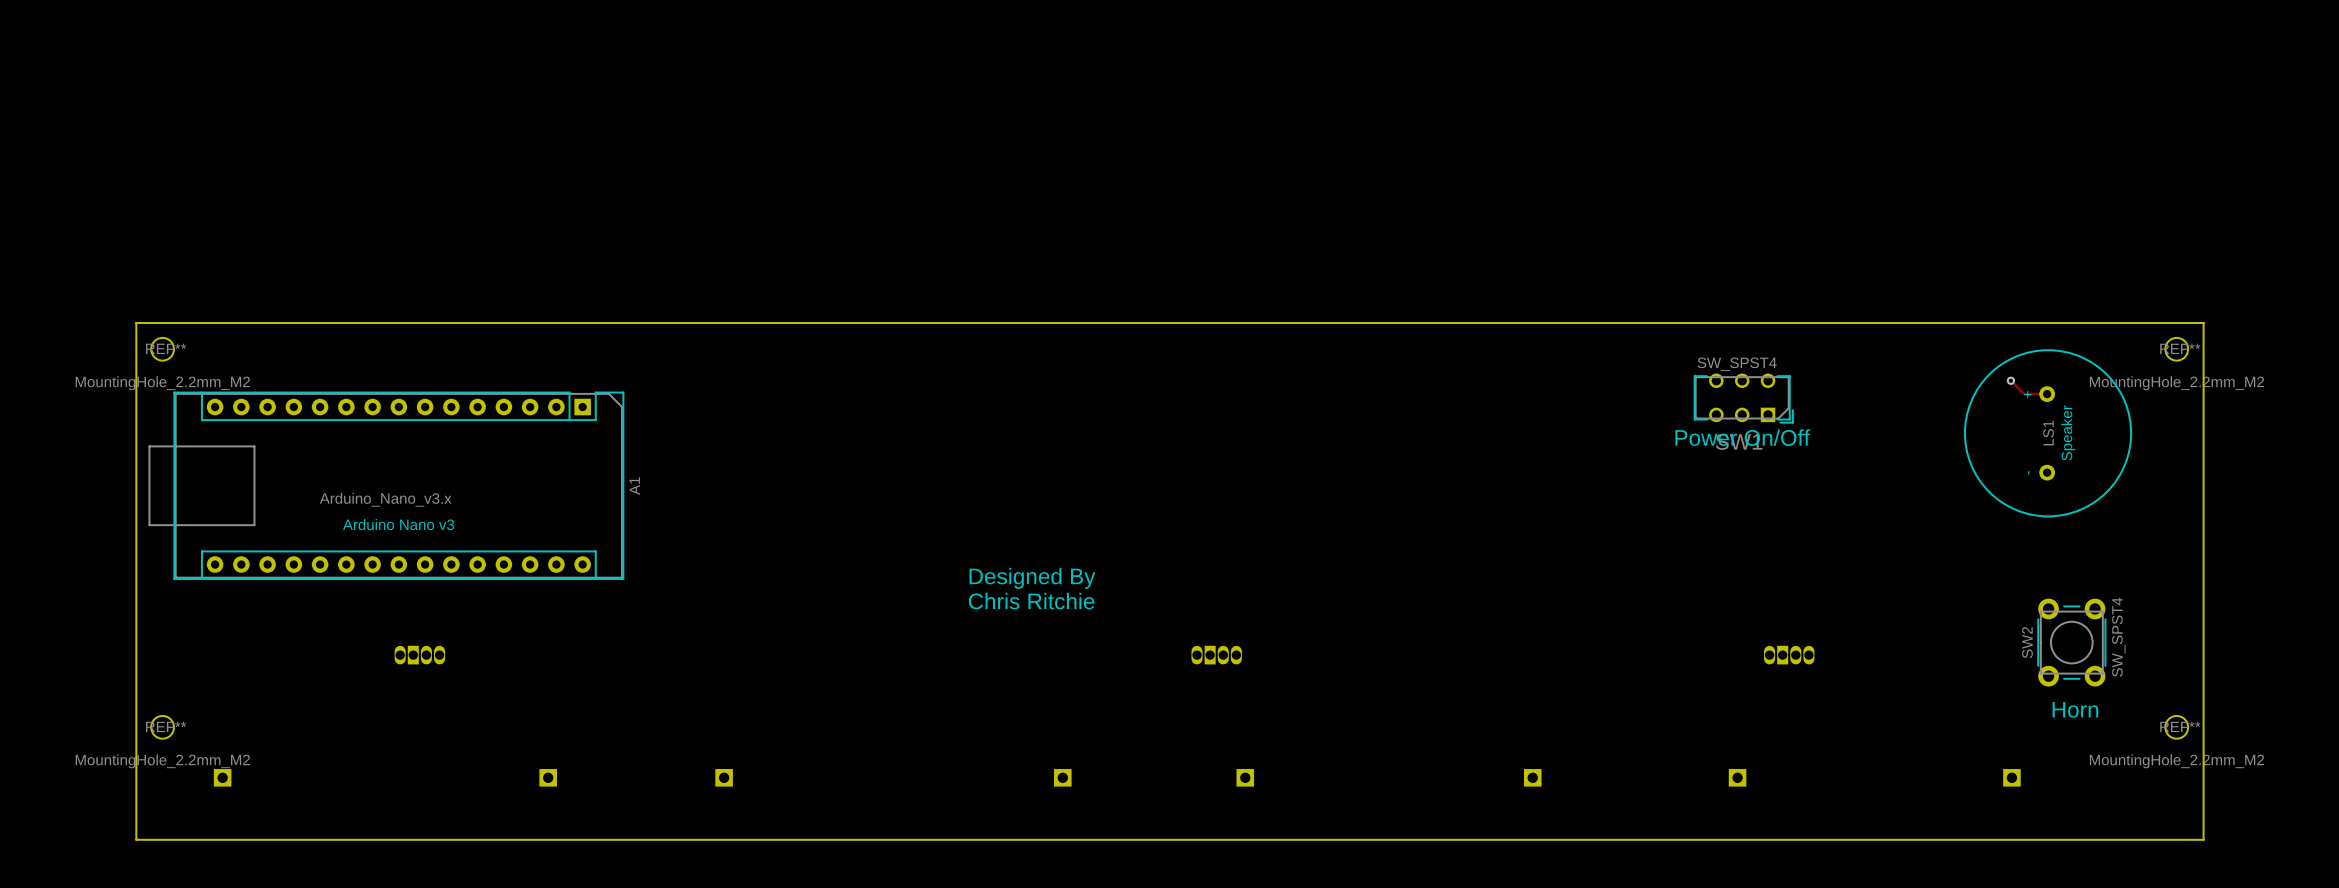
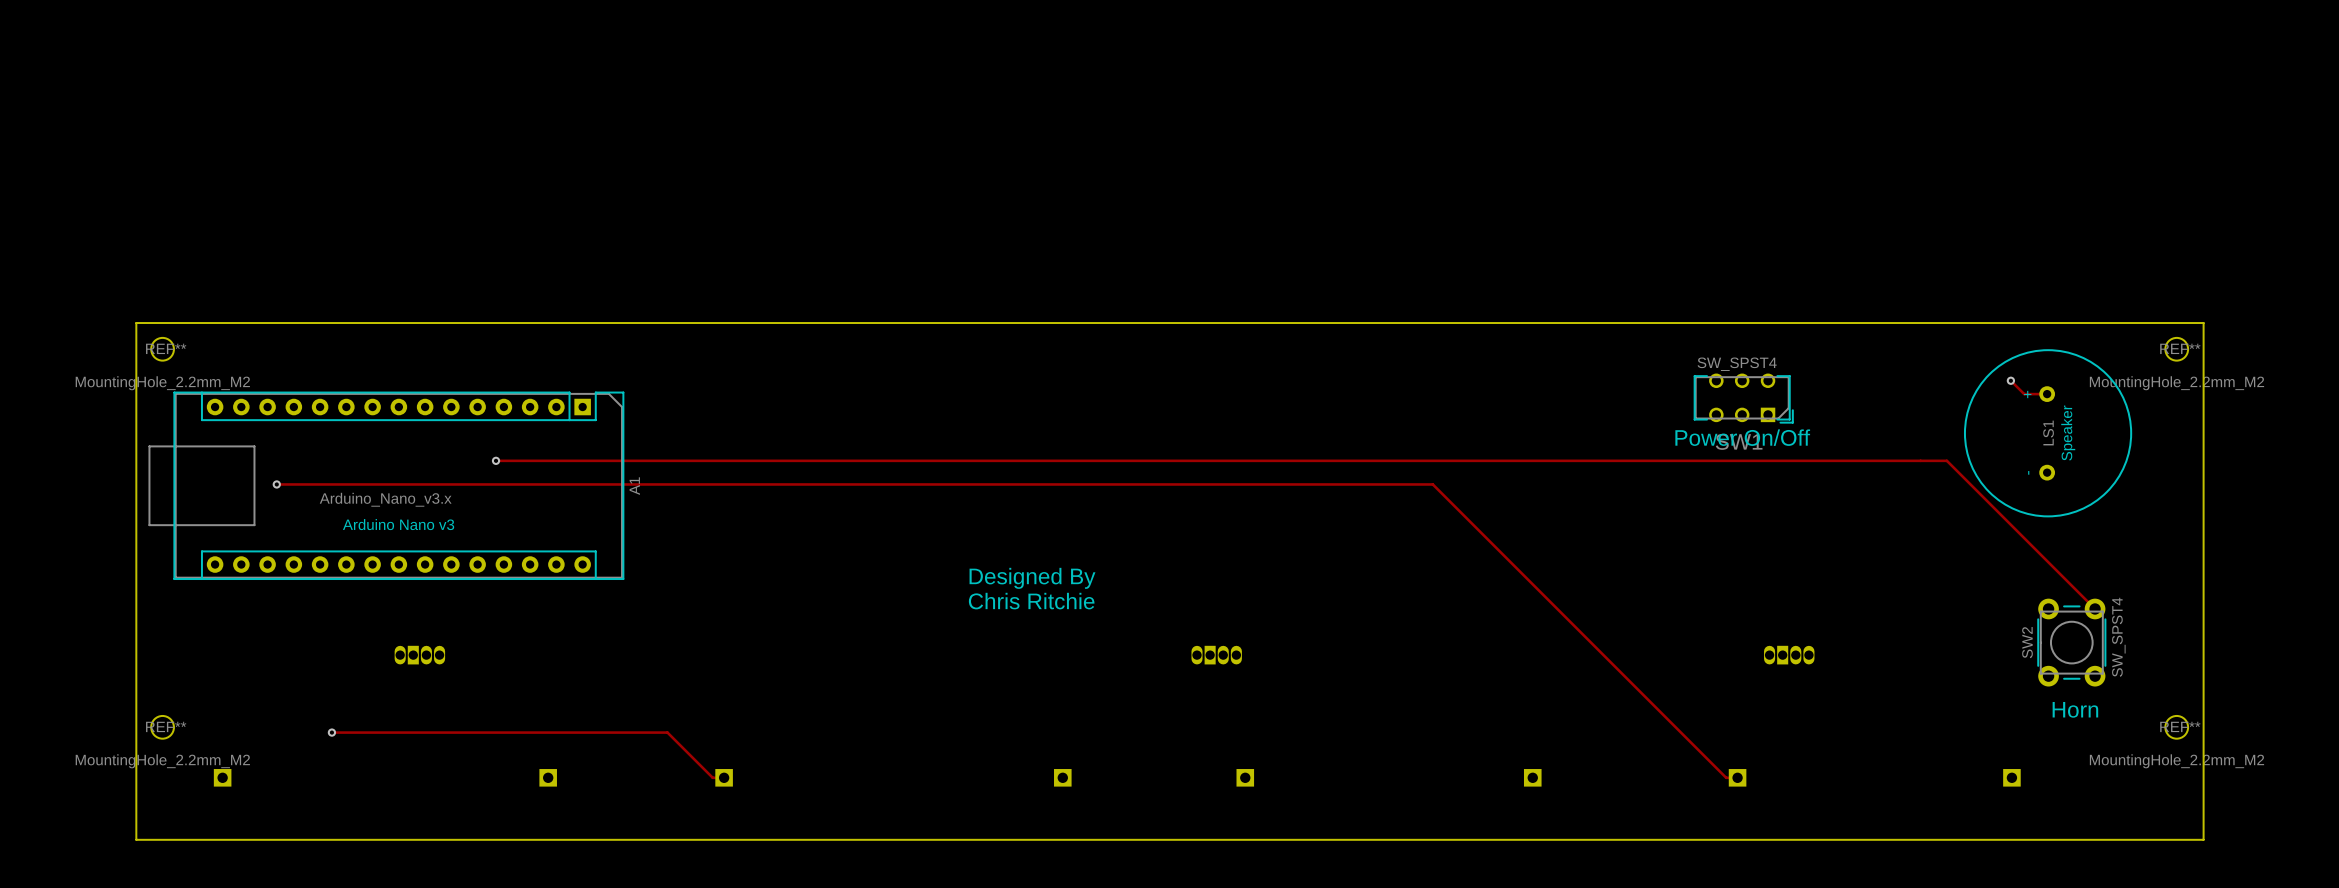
track: none -> (496, 460) (1946, 460) (2095, 608)
via: none -> (496, 460)
track: none -> (276, 484) (1432, 484) (1726, 777) (1737, 777)
via: none -> (276, 484)
track: none -> (331, 732) (667, 732) (712, 777) (724, 777)
via: none -> (331, 732)

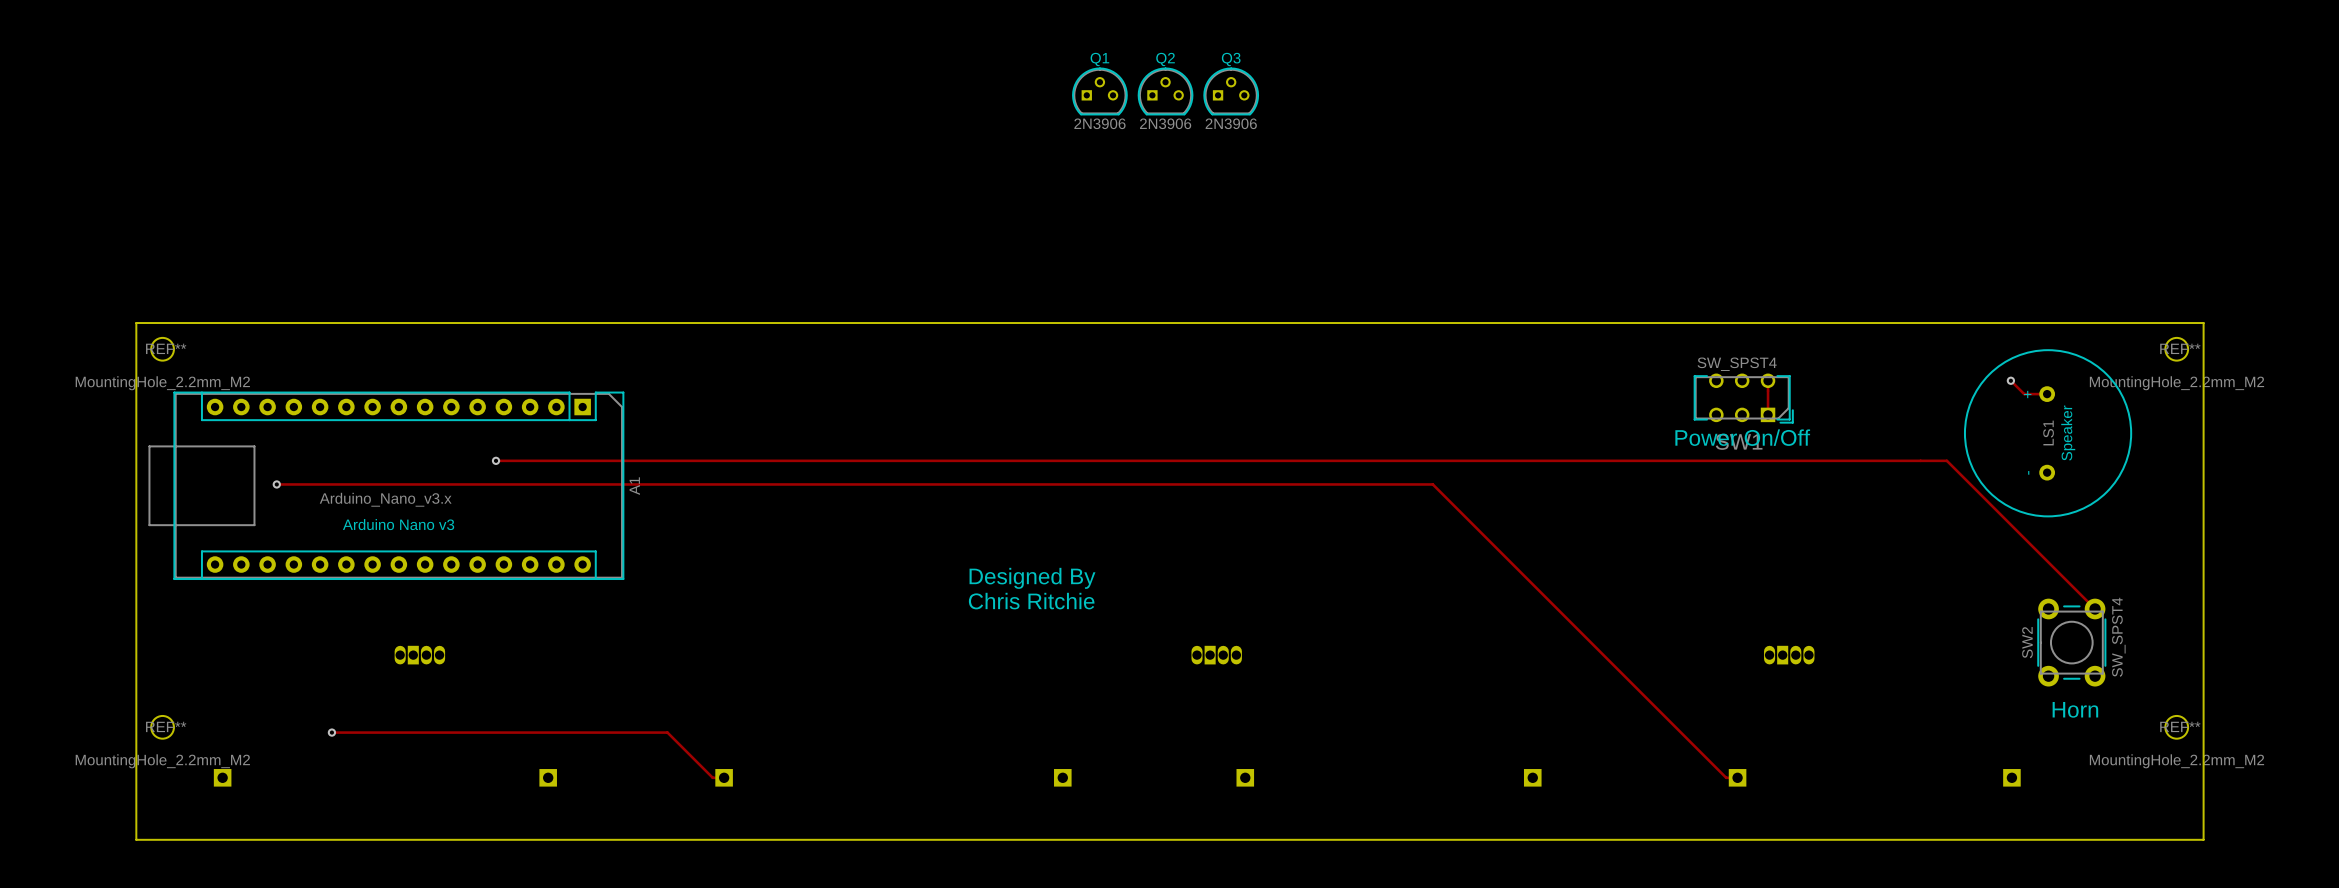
Q1: none -> 2N3906 (1099, 91)
Q2: none -> 2N3906 (1165, 91)
Q3: none -> 2N3906 (1231, 91)
track: none -> (1768, 380) (1768, 414)

